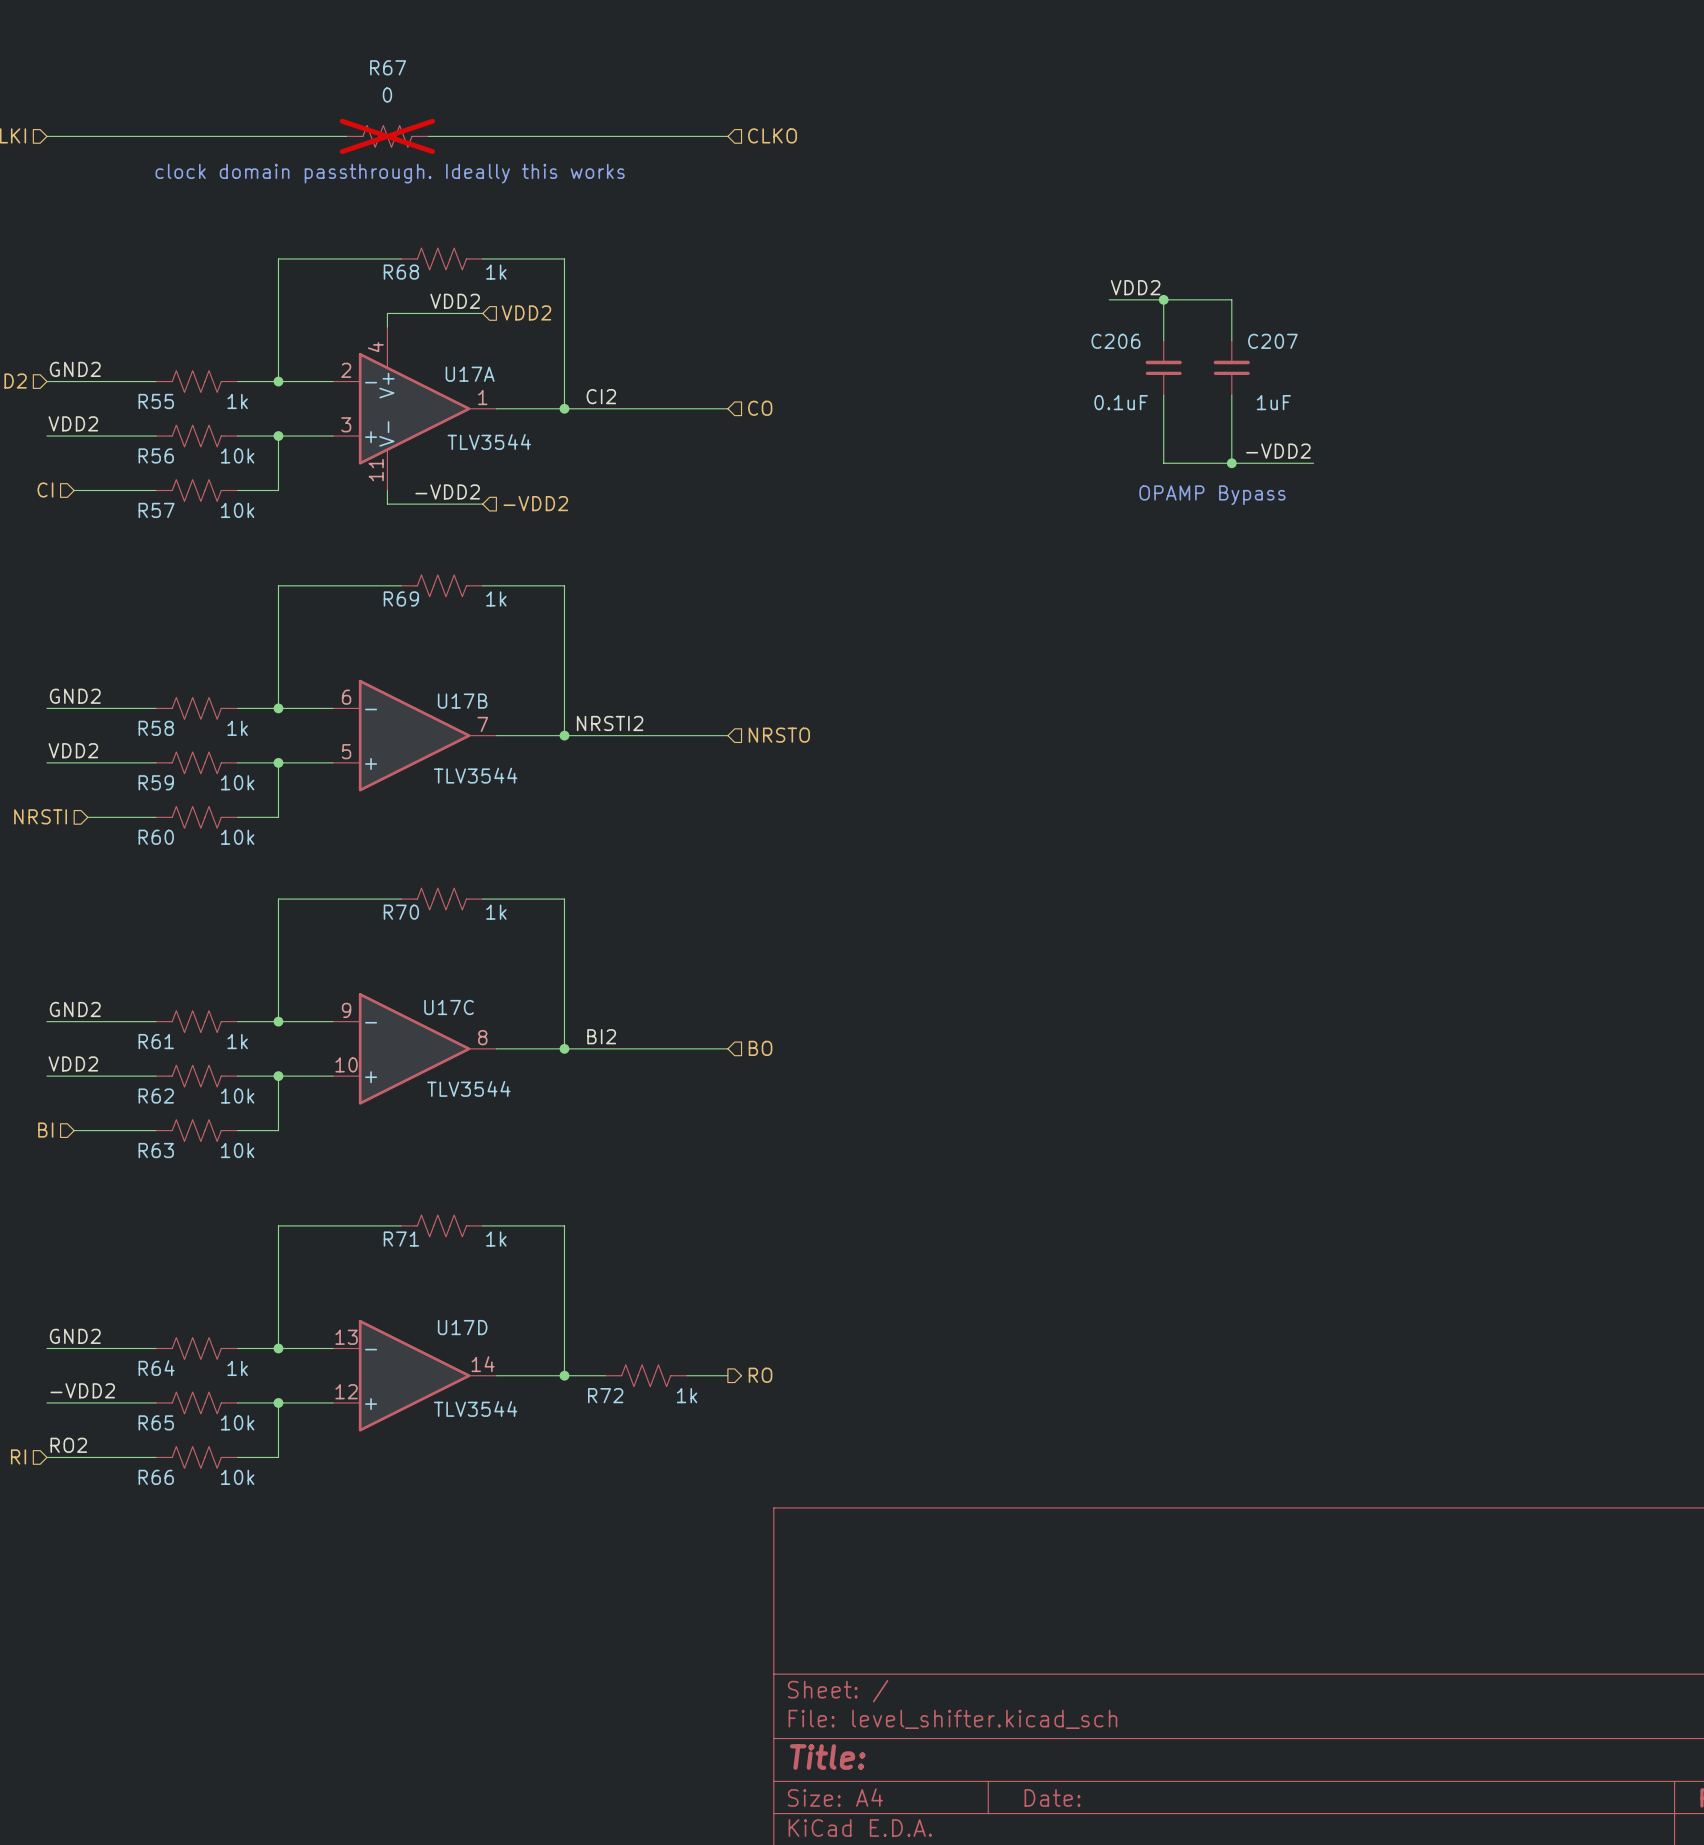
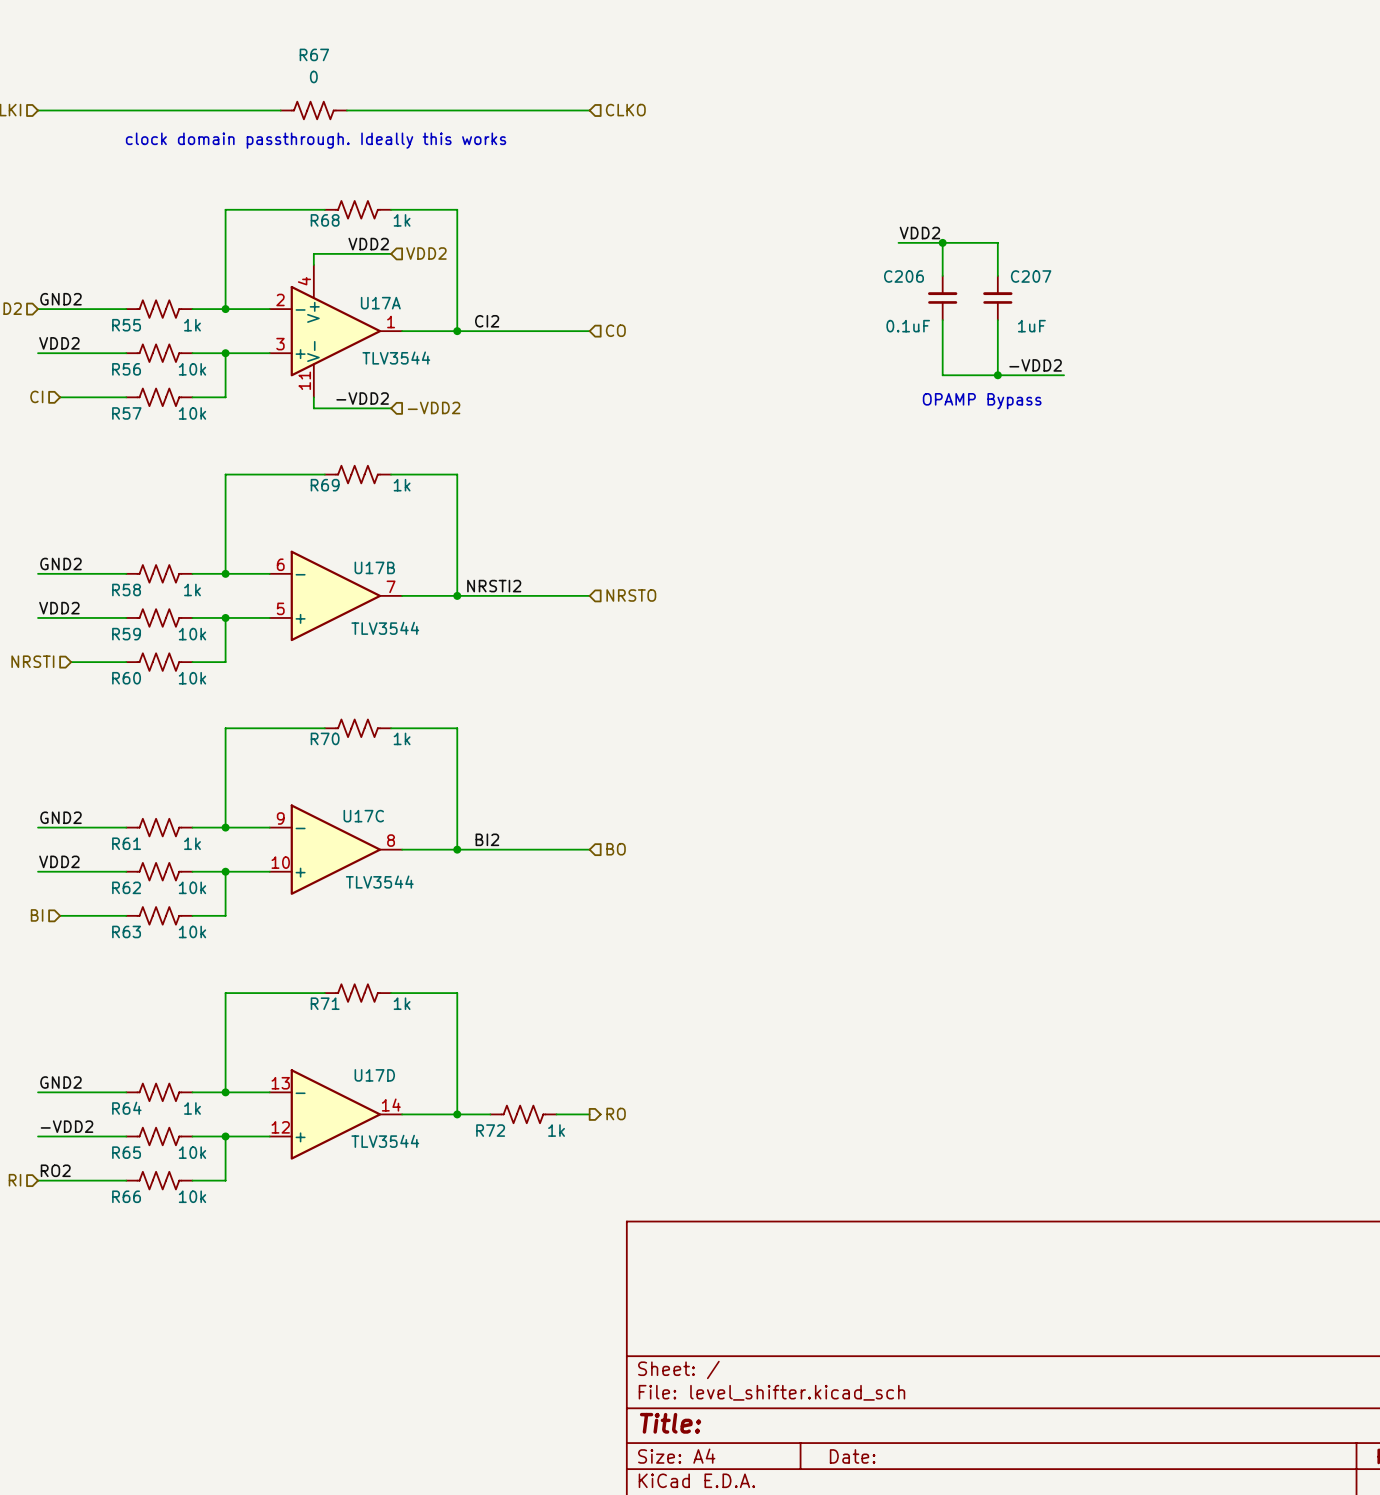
R67 do-not-place cross: (387, 136) -> none

